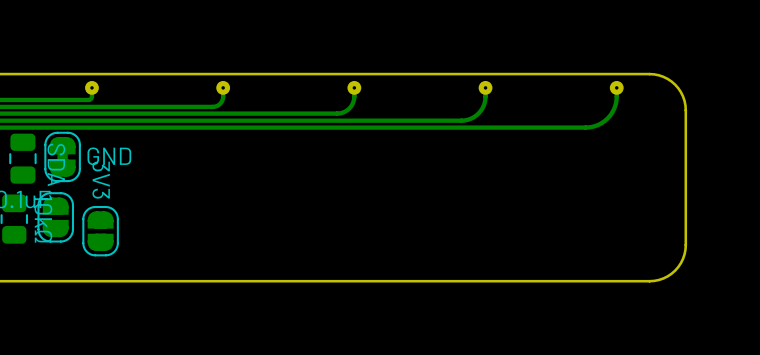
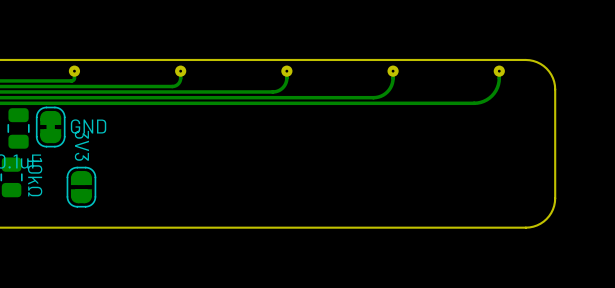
part: SDA (55, 217) -> none

